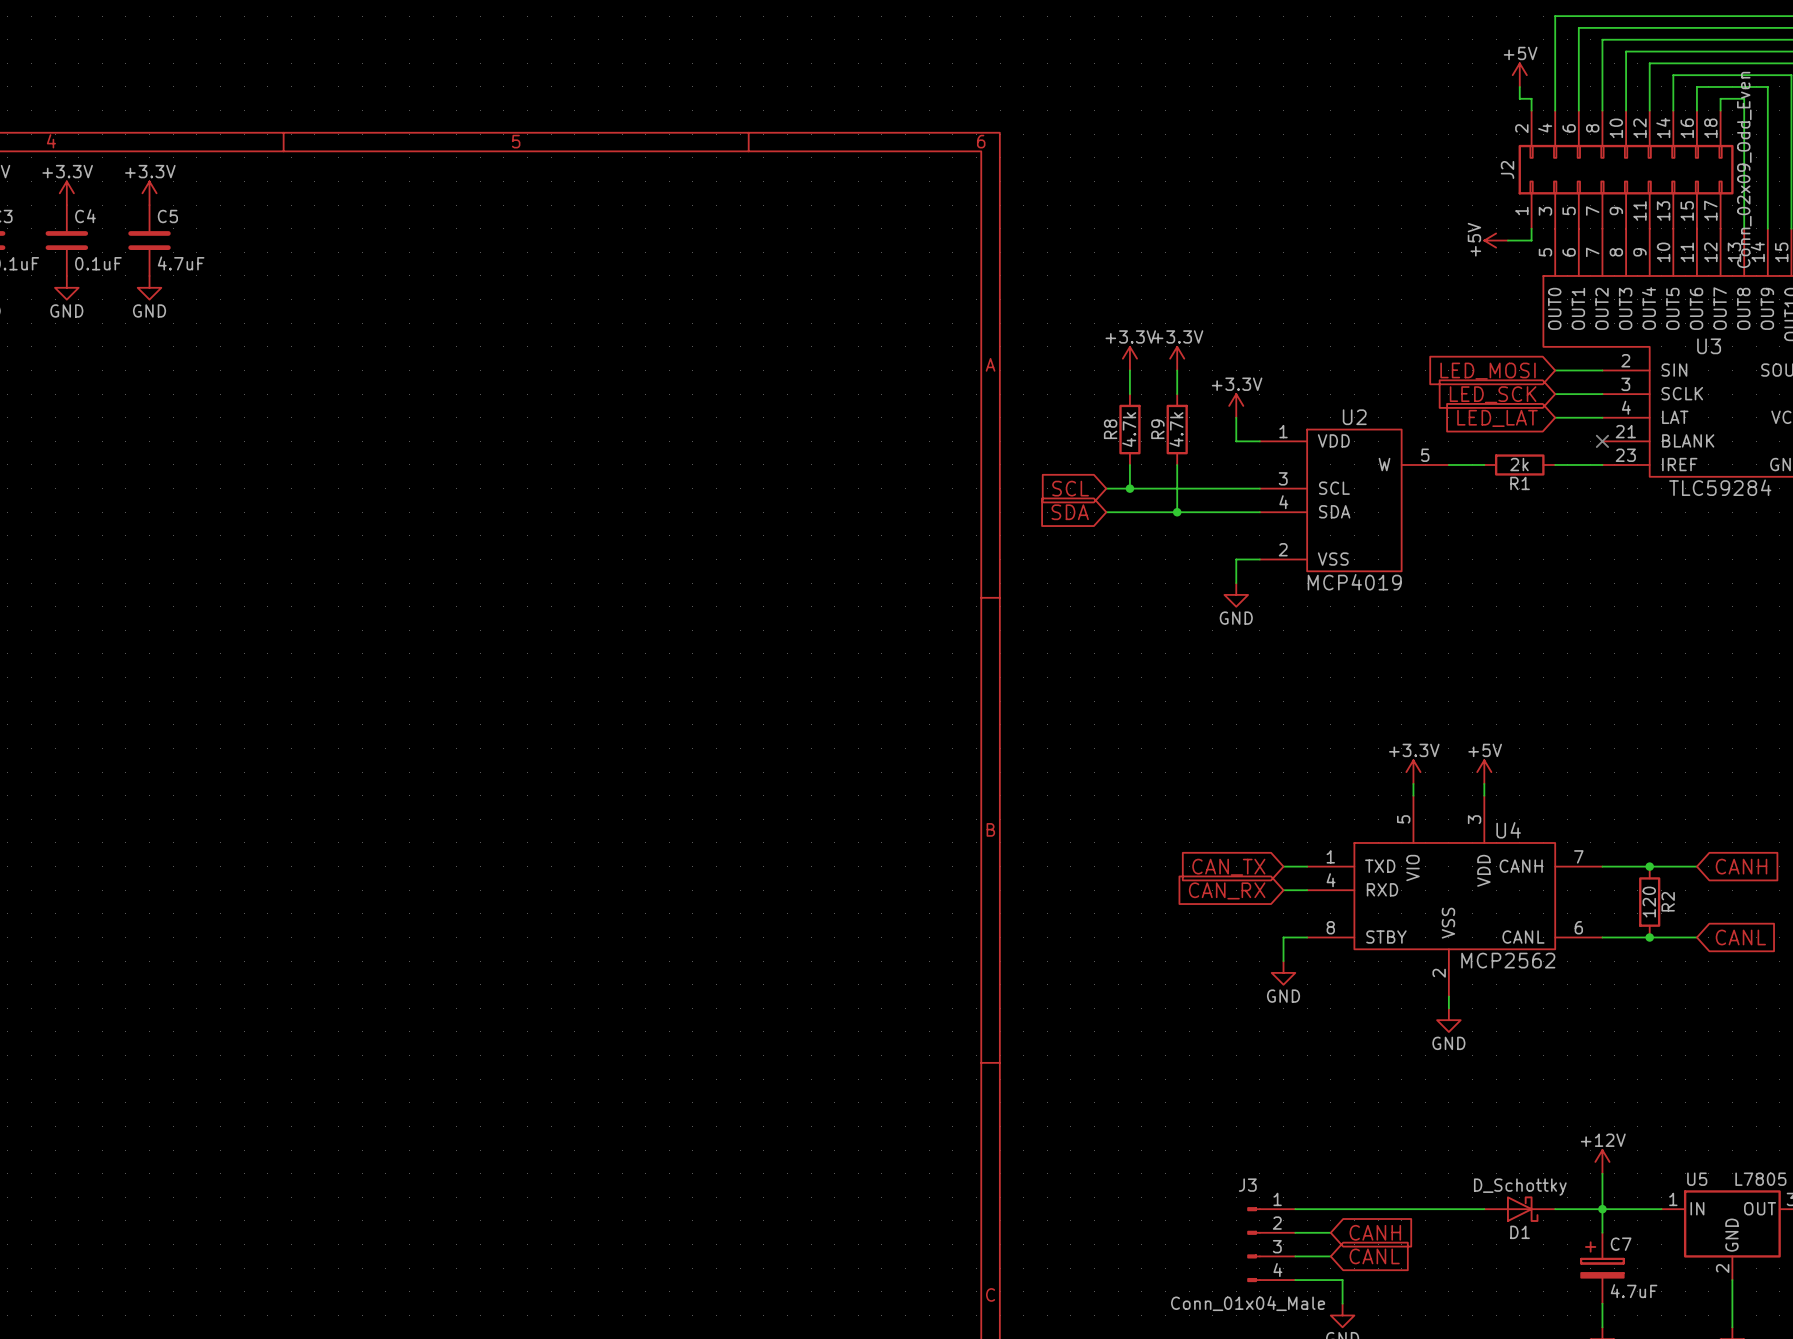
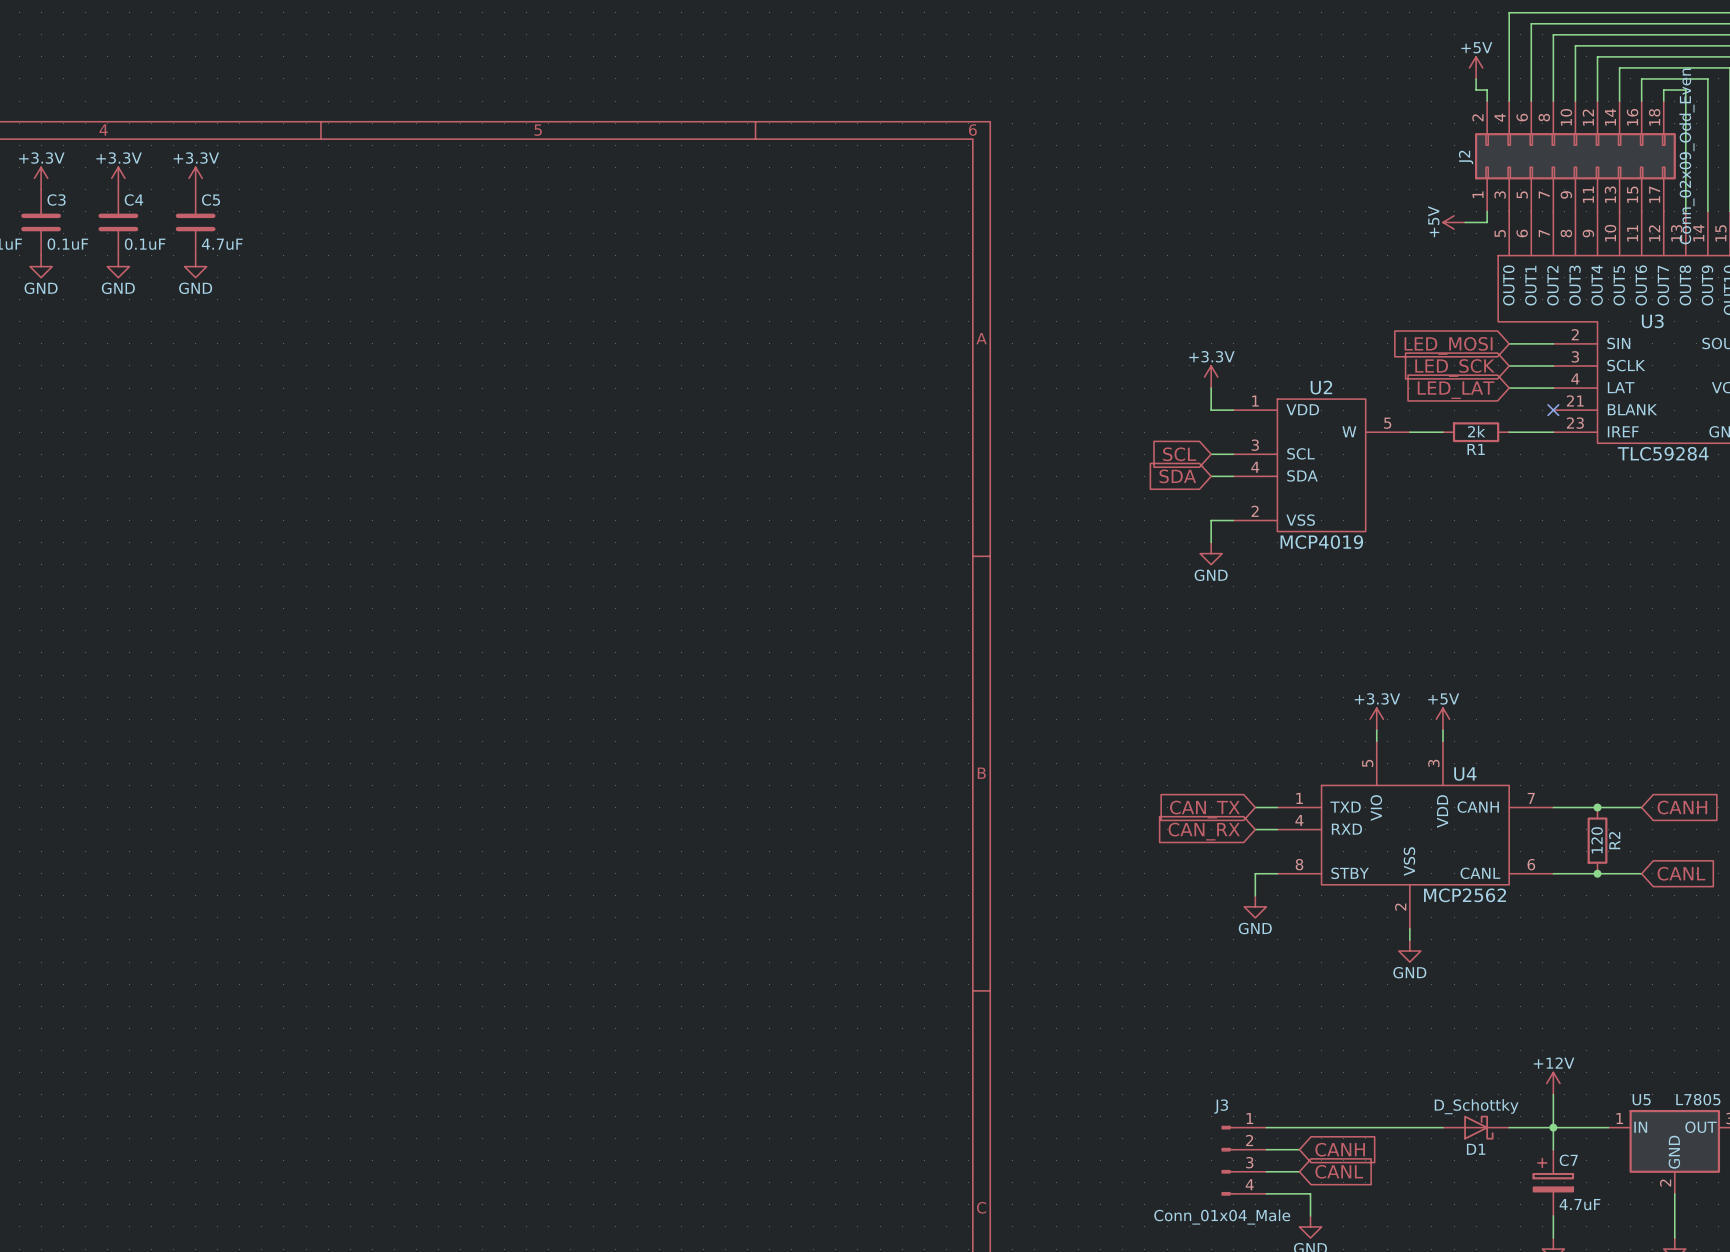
power symbol: +3.3V (1129, 358) -> none
power symbol: +3.3V (1177, 358) -> none
wire: (1129, 370) (1129, 394) -> none
wire: (1177, 370) (1177, 394) -> none
R8: 4.7k (1129, 429) -> none
R9: 4.7k (1177, 429) -> none
wire: (1129, 464) (1129, 488) -> none
wire: (1177, 464) (1177, 512) -> none
global label position: SCL (1070, 488) -> SCL (1179, 454)
wire: (1106, 488) (1236, 488) -> none
junction: (1129, 488) -> none
global label position: SDA (1070, 512) -> SDA (1177, 476)
wire: (1106, 512) (1236, 512) -> none
junction: (1177, 512) -> none

